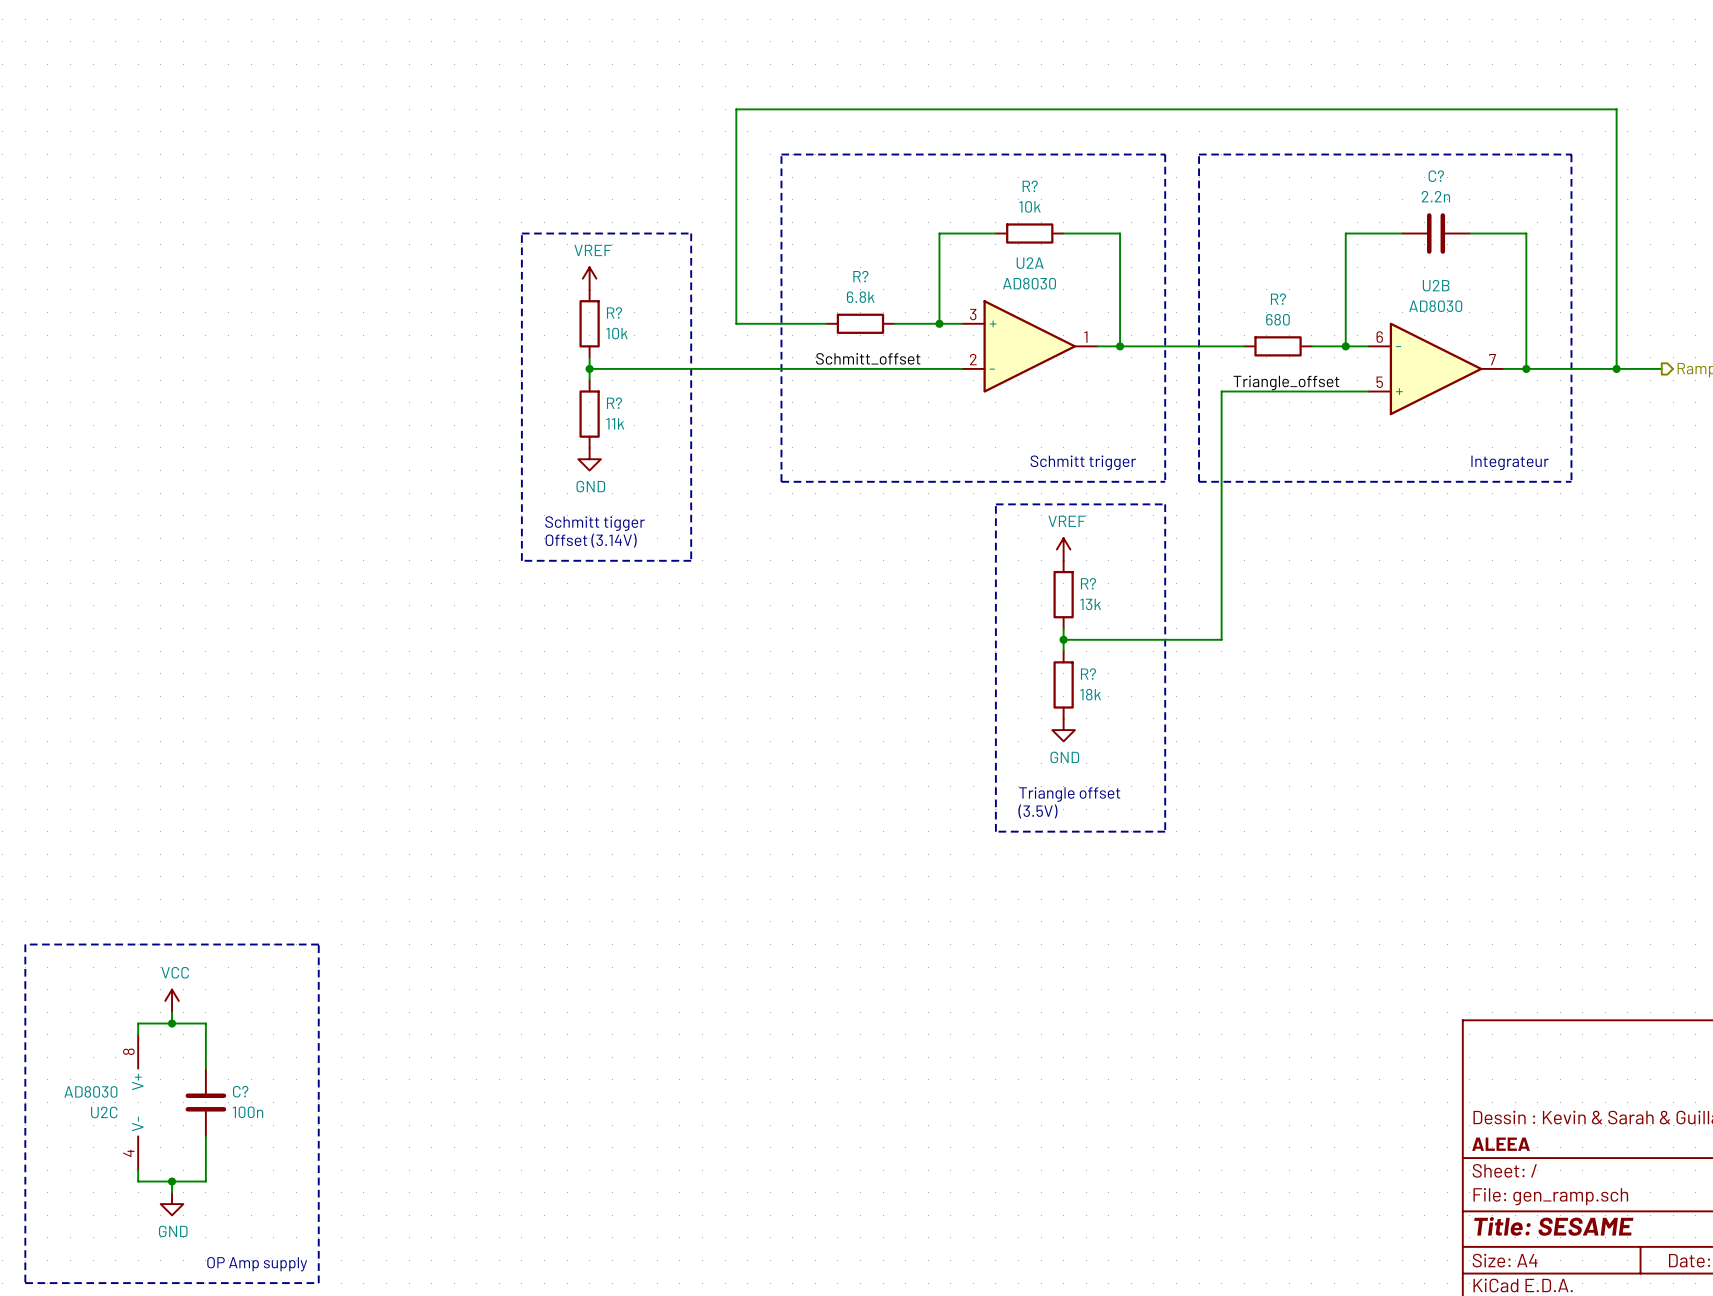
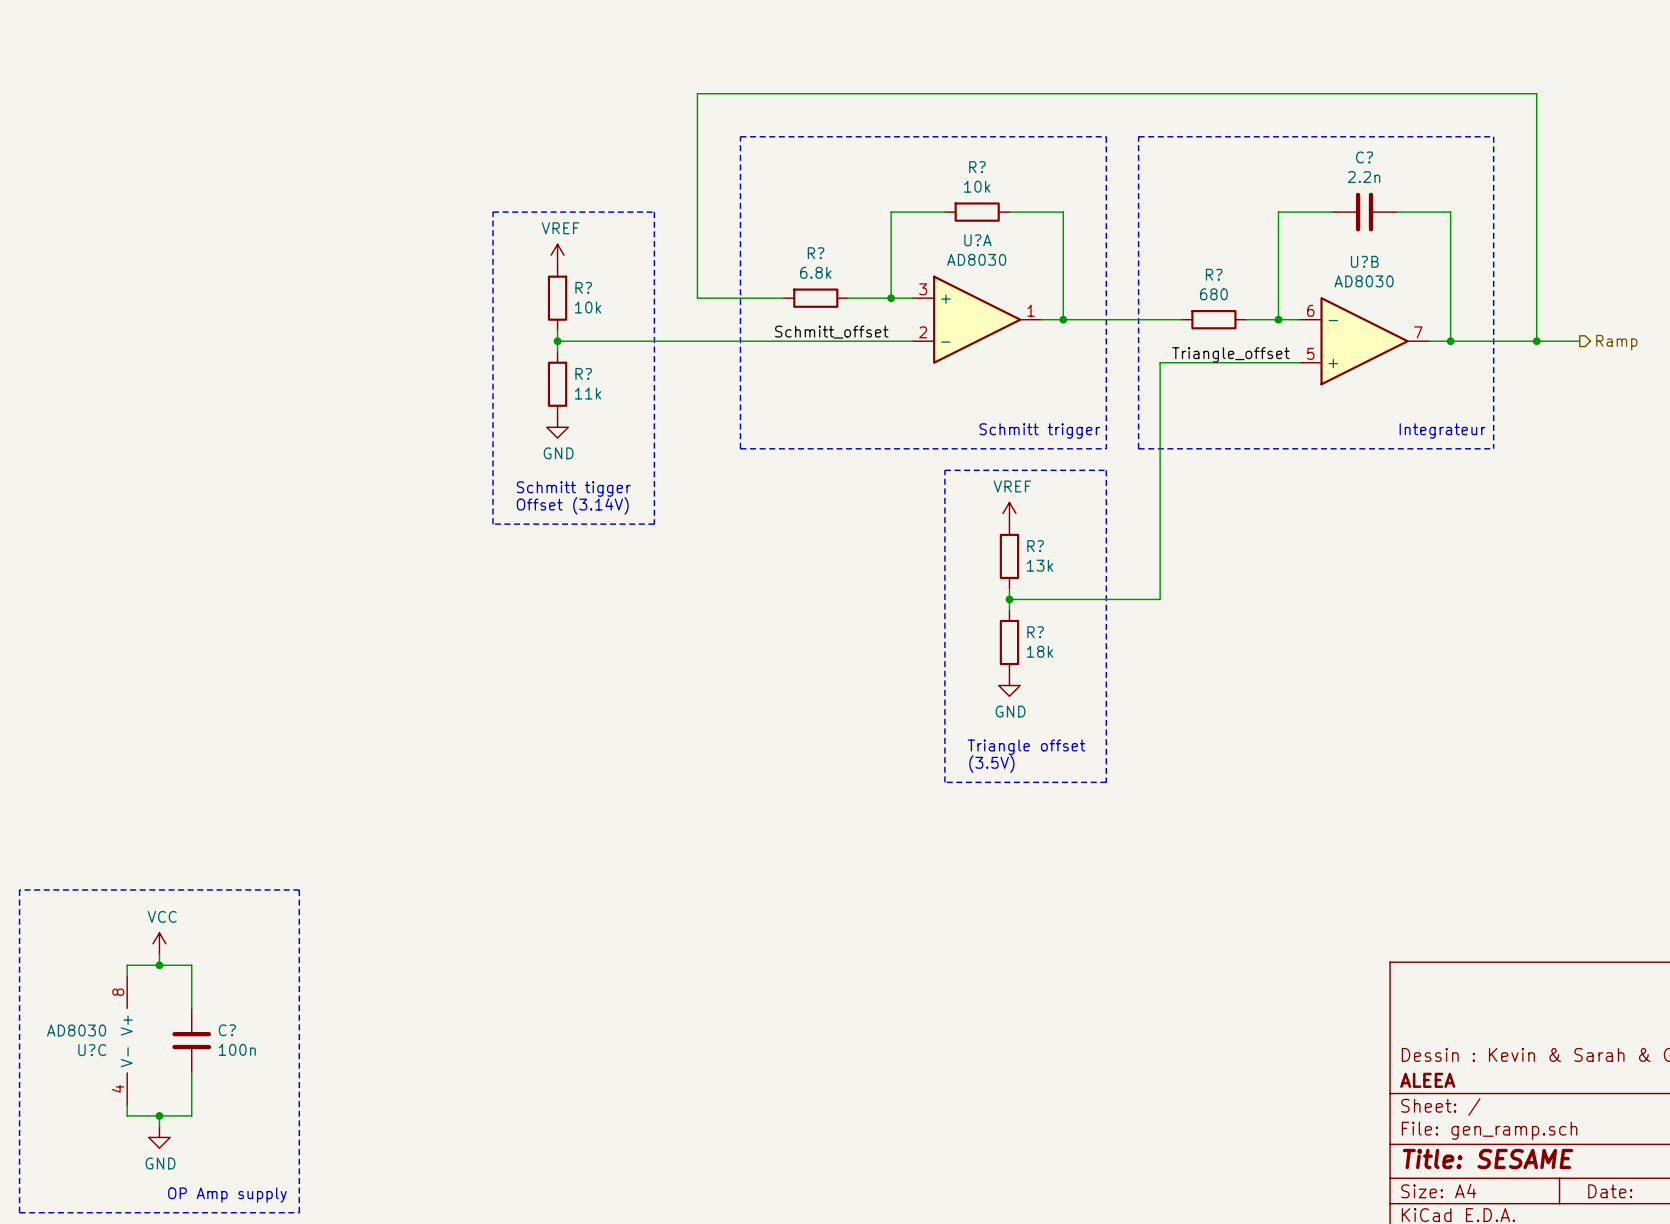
U2A name: U2A (1030, 263) -> U?A (977, 240)
U2B name: U2B (1436, 285) -> U?B (1364, 261)
U2C name: U2C (104, 1112) -> U?C (92, 1050)

